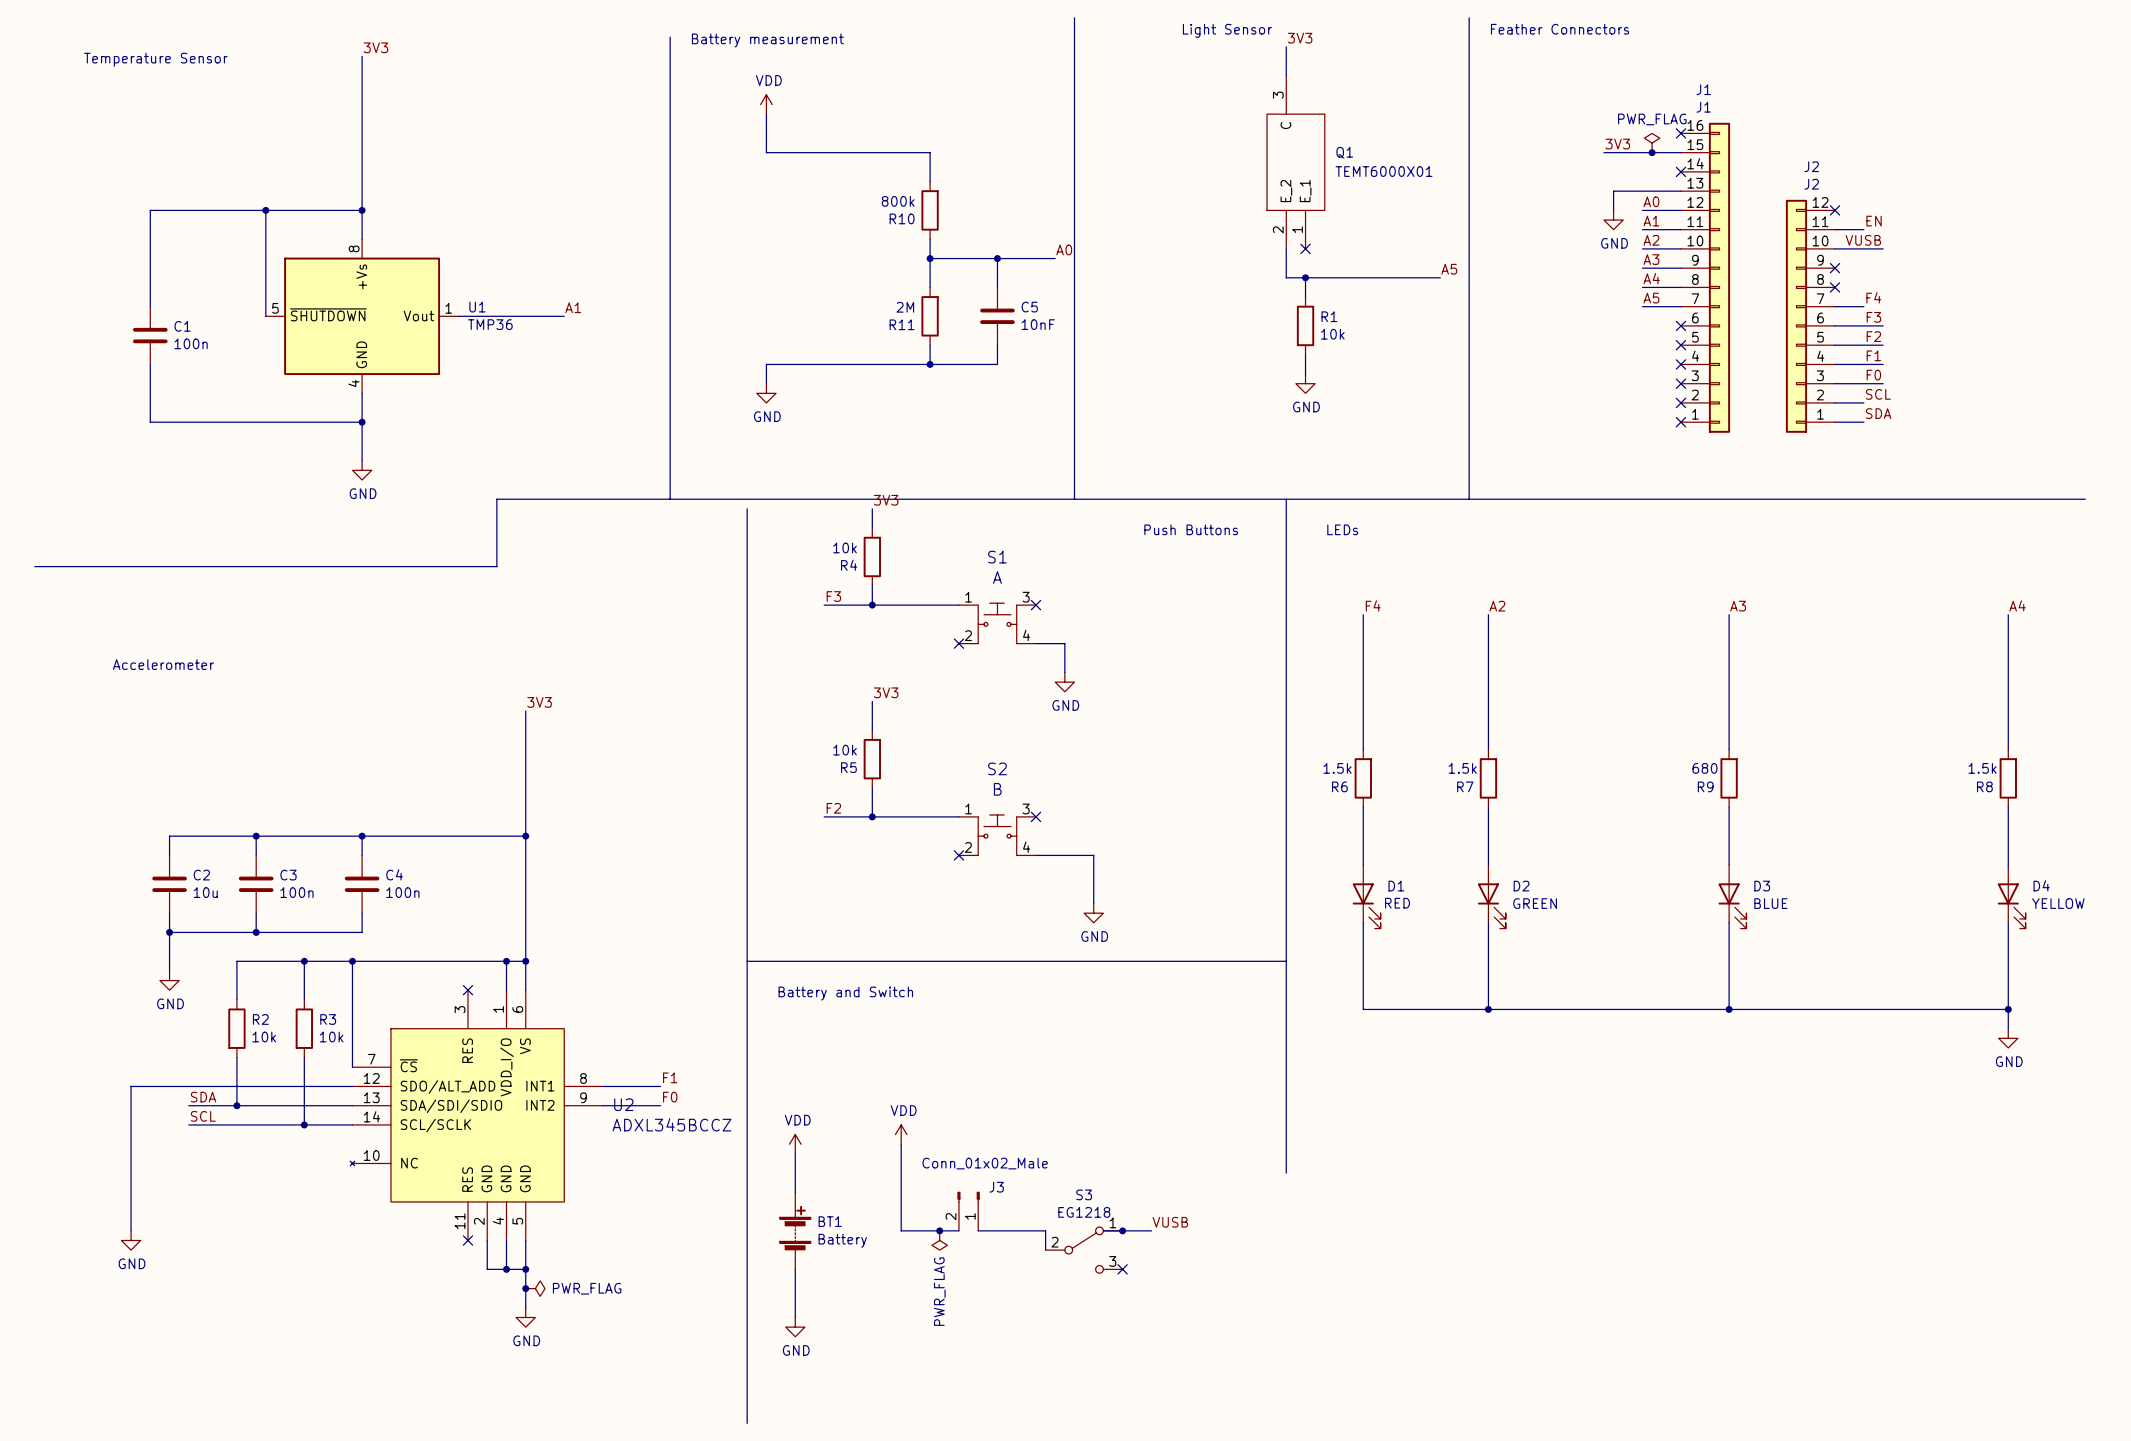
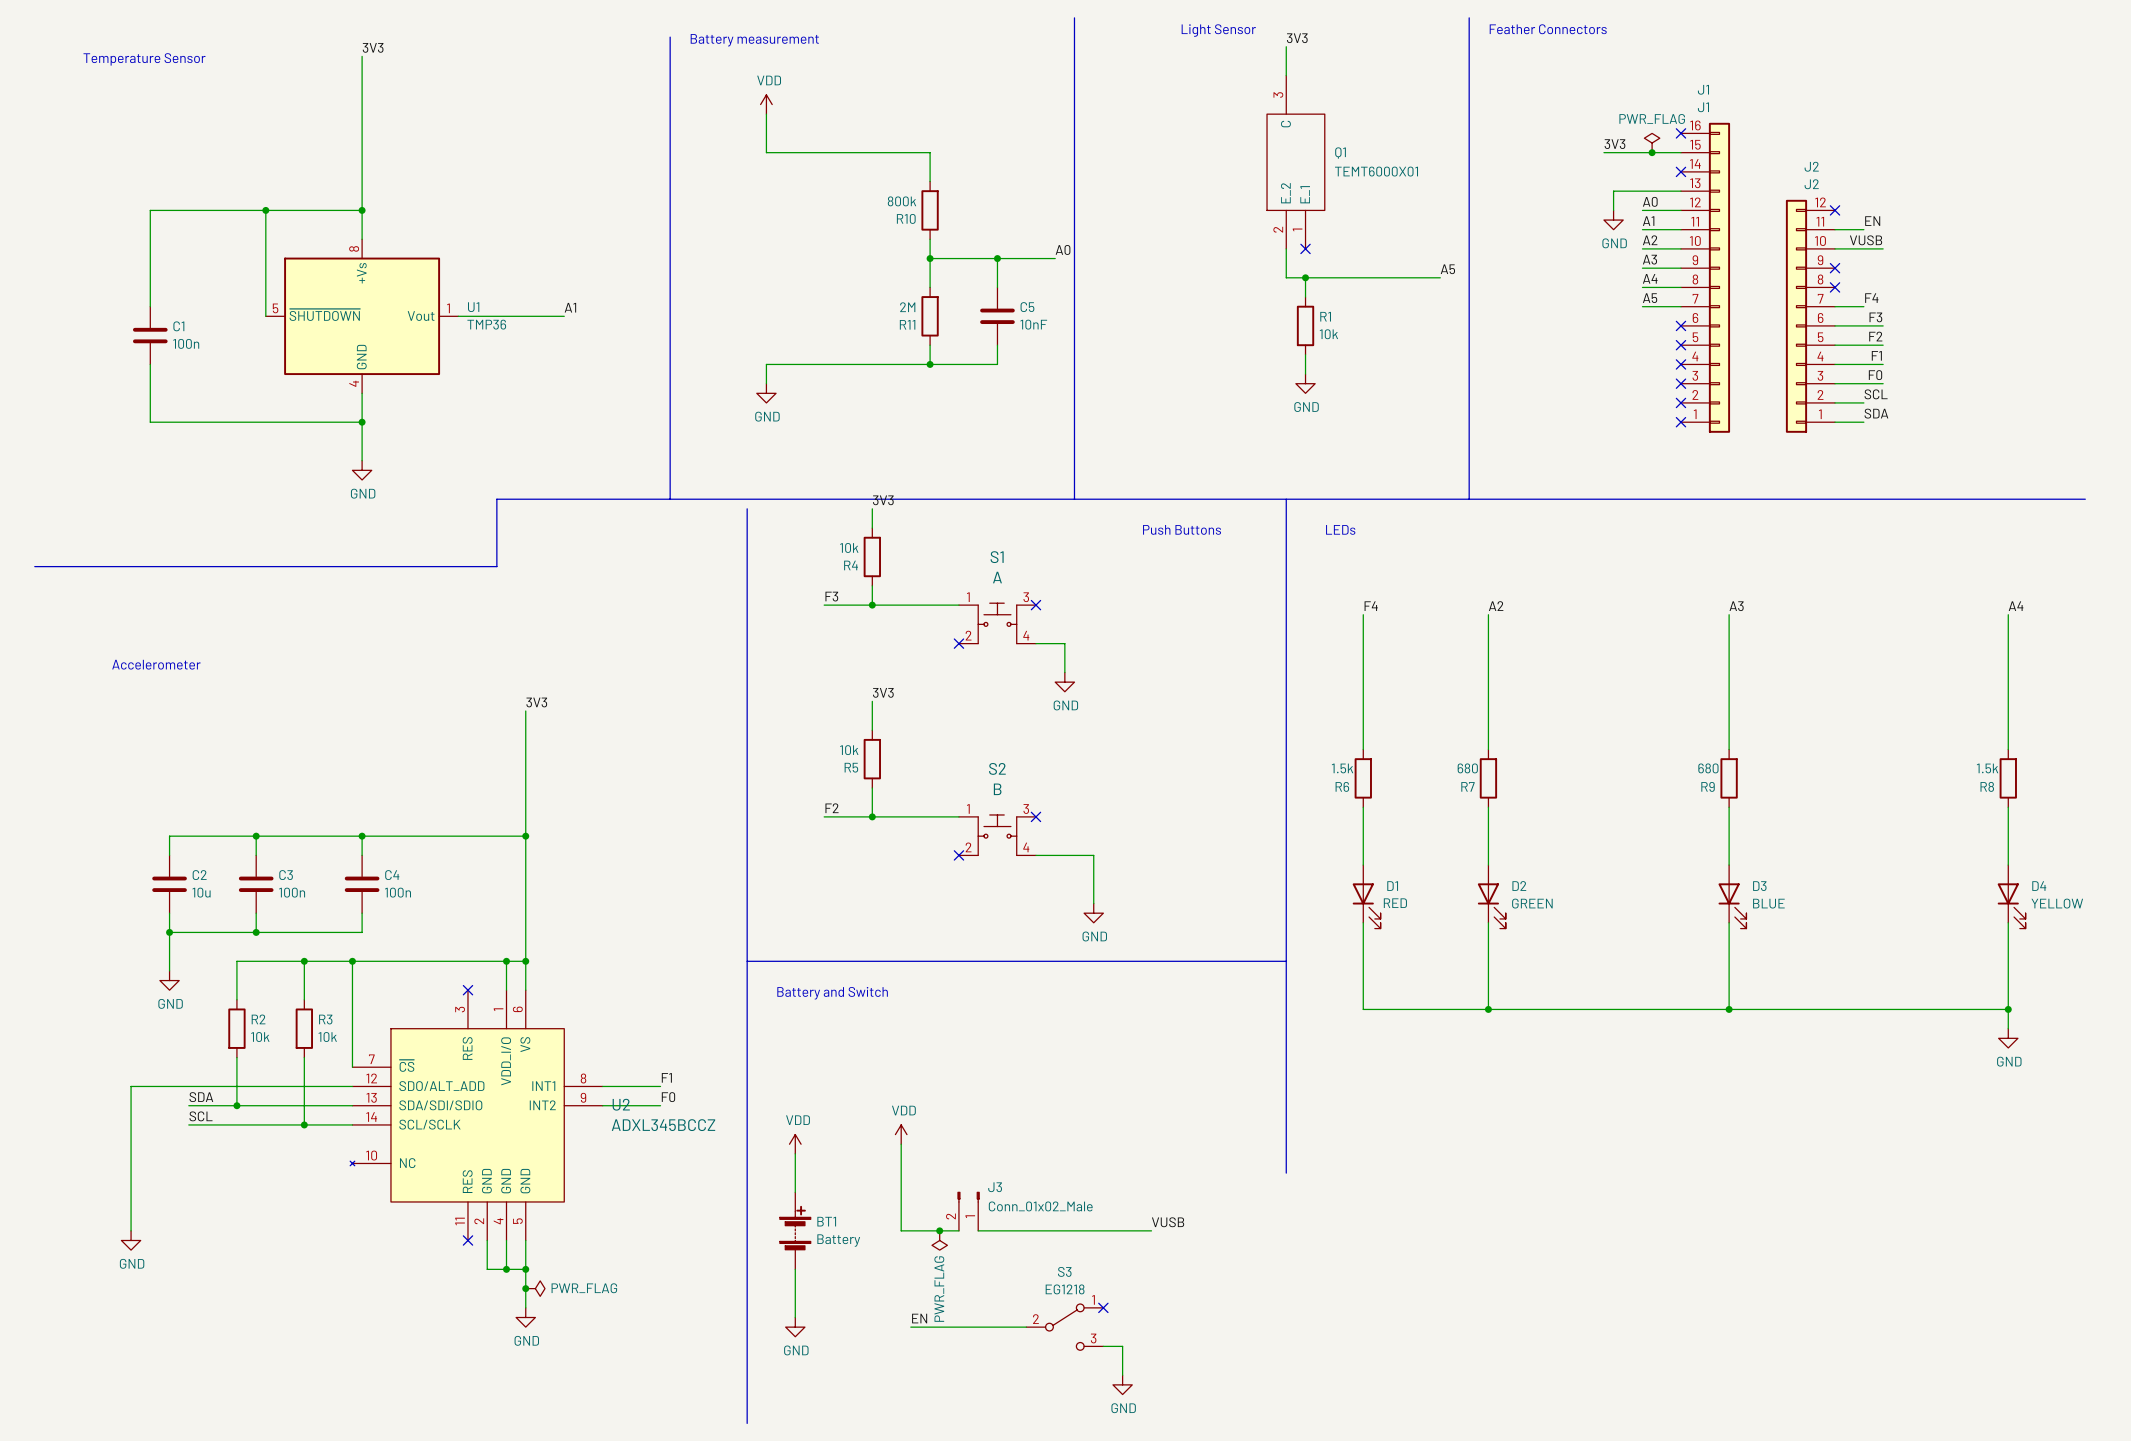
R7 value: 1.5k (1462, 768) -> 680 (1467, 768)
J3 value position: Conn_01x02_Male (985, 1163) -> Conn_01x02_Male (1040, 1206)
wire: (1045, 1230) (1045, 1250) -> (1045, 1230) (1103, 1230)
junction: (1122, 1230) -> none
S3 position: (1084, 1250) -> (1064, 1327)
no-connect mark position: (1122, 1269) -> (1103, 1307)
label: none -> EN (919, 1318)
wire: none -> (910, 1327) (1026, 1327)
wire: none -> (1103, 1346) (1122, 1346) (1122, 1375)
power symbol: none -> GND (1122, 1384)

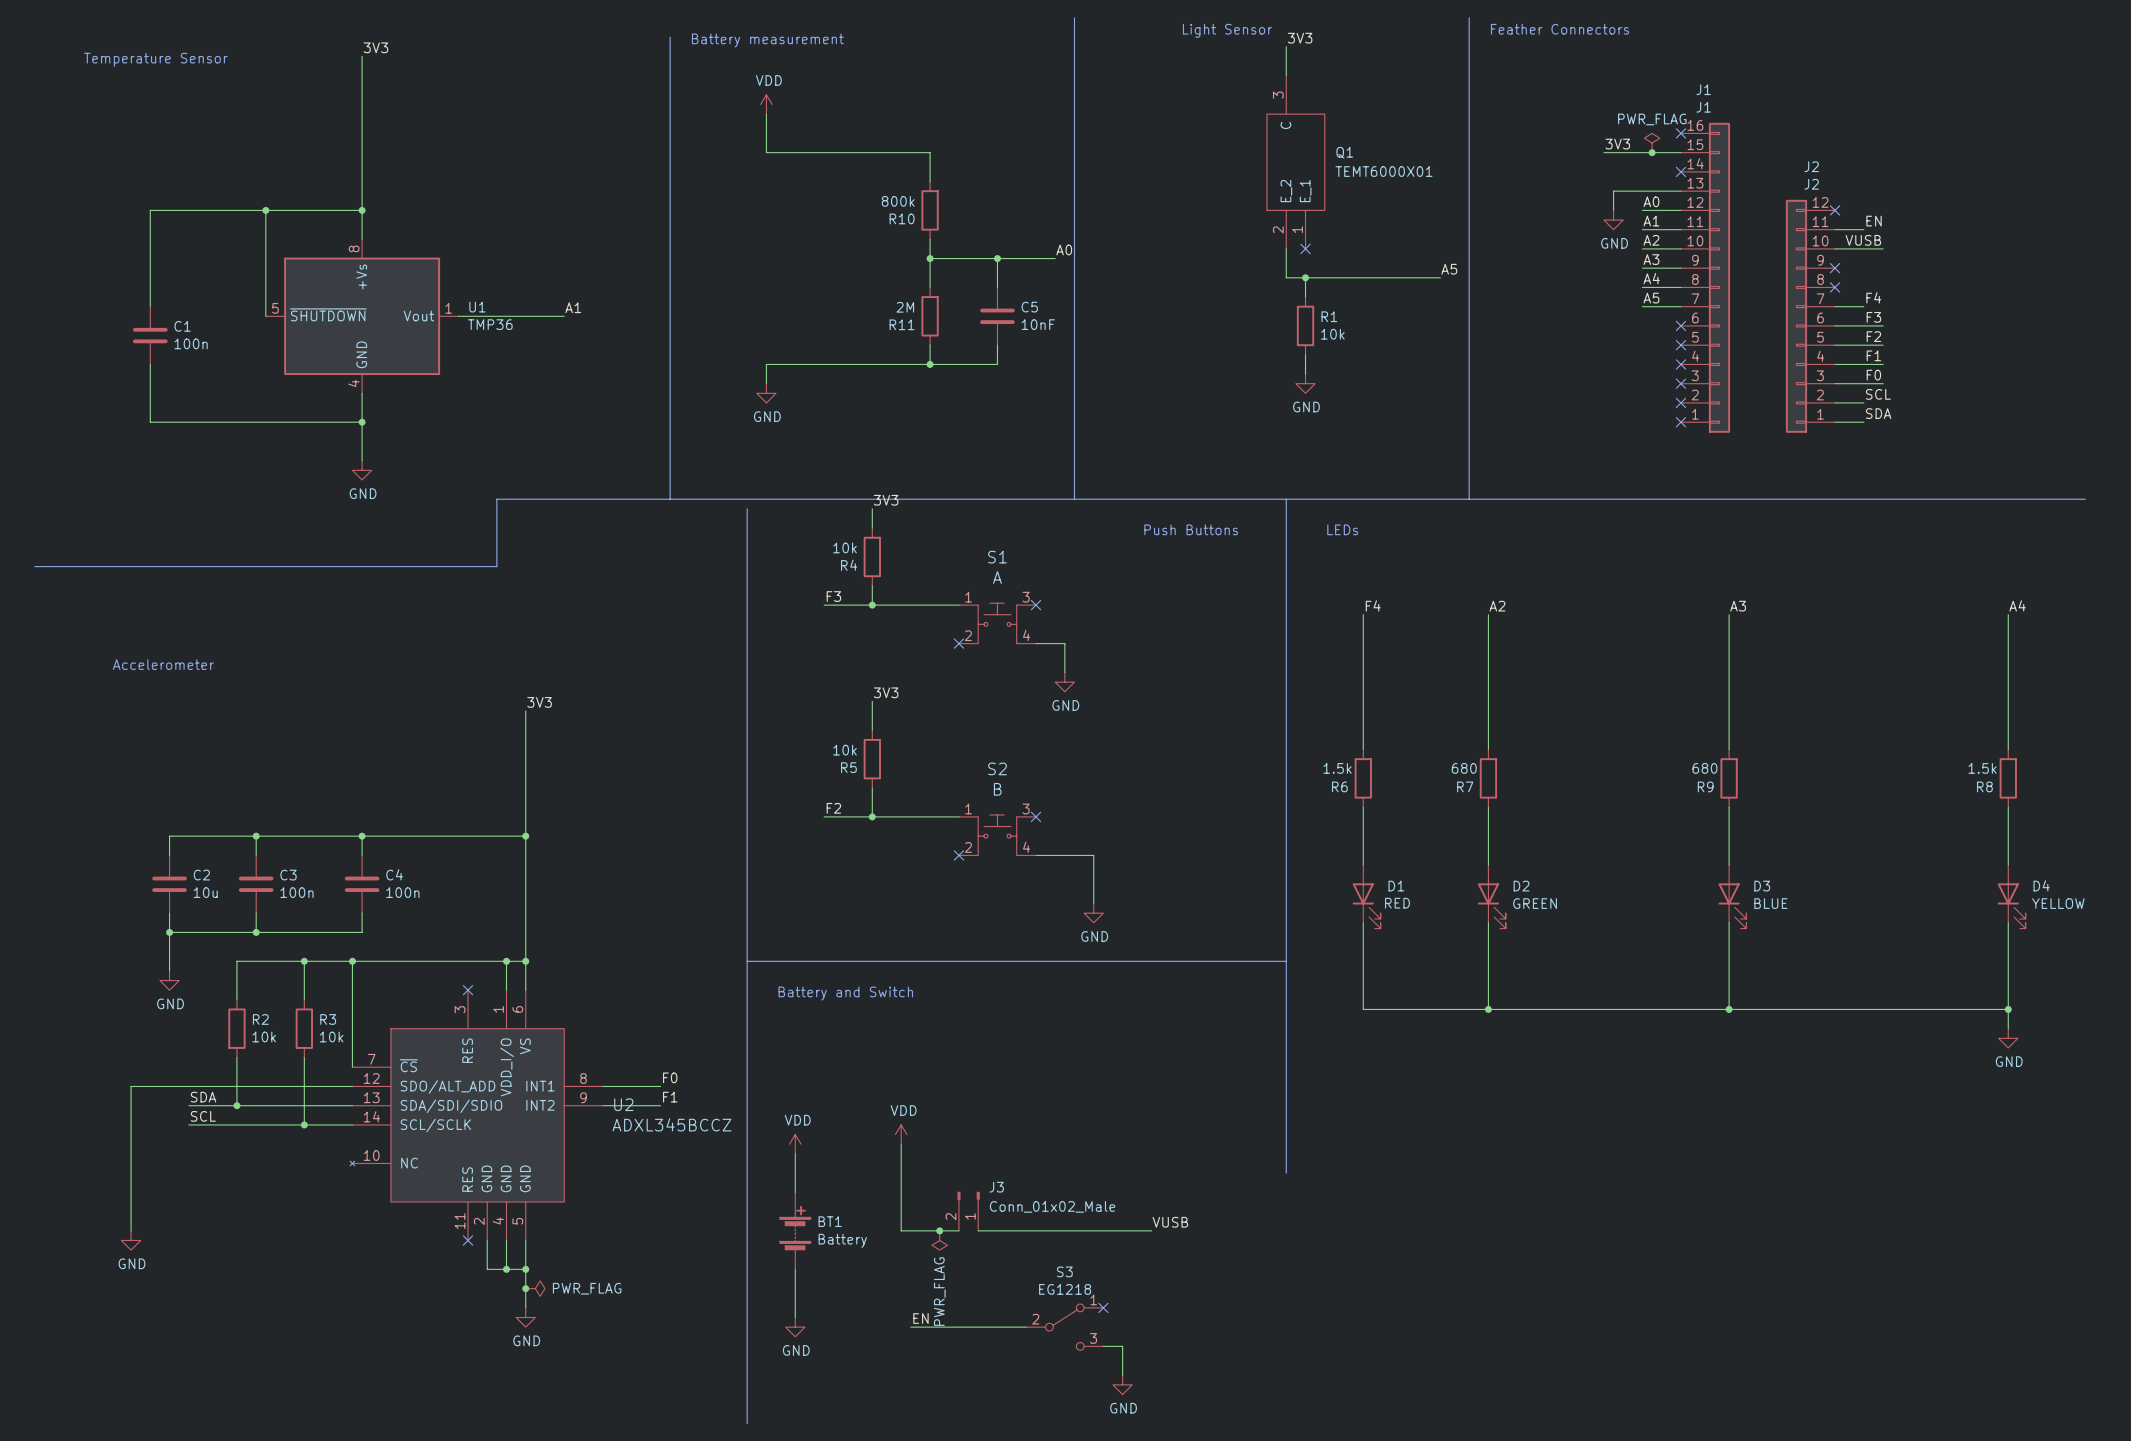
label: F1 (666, 1077) -> F0 (670, 1077)
label: F0 (668, 1097) -> F1 (670, 1097)

